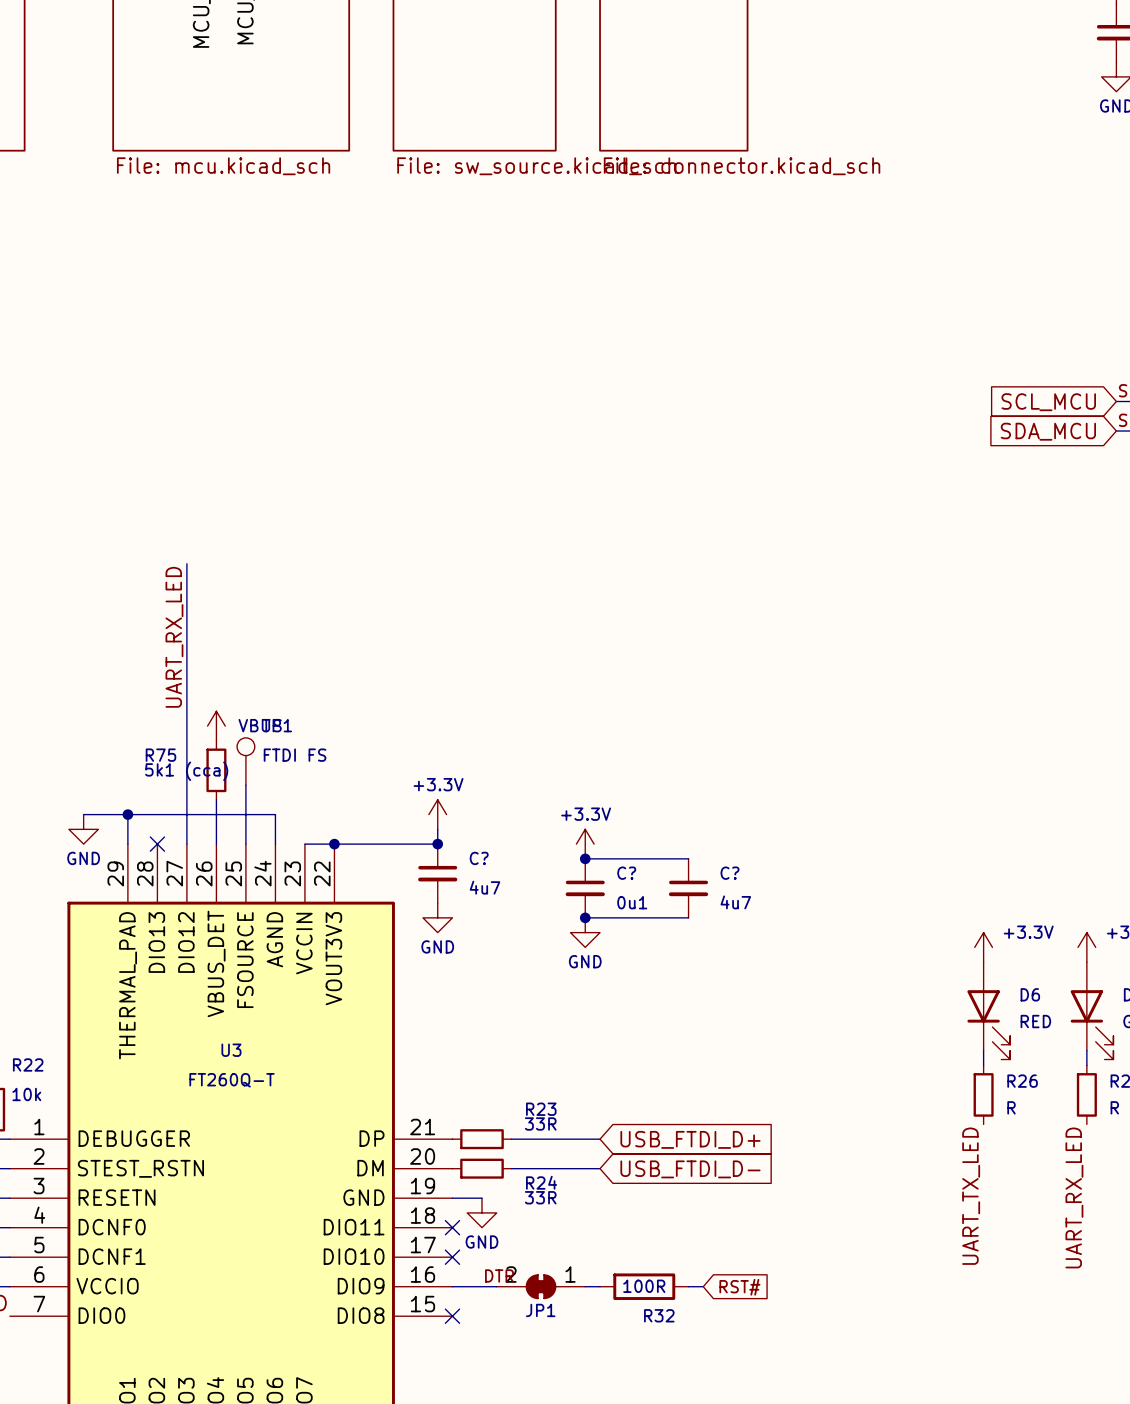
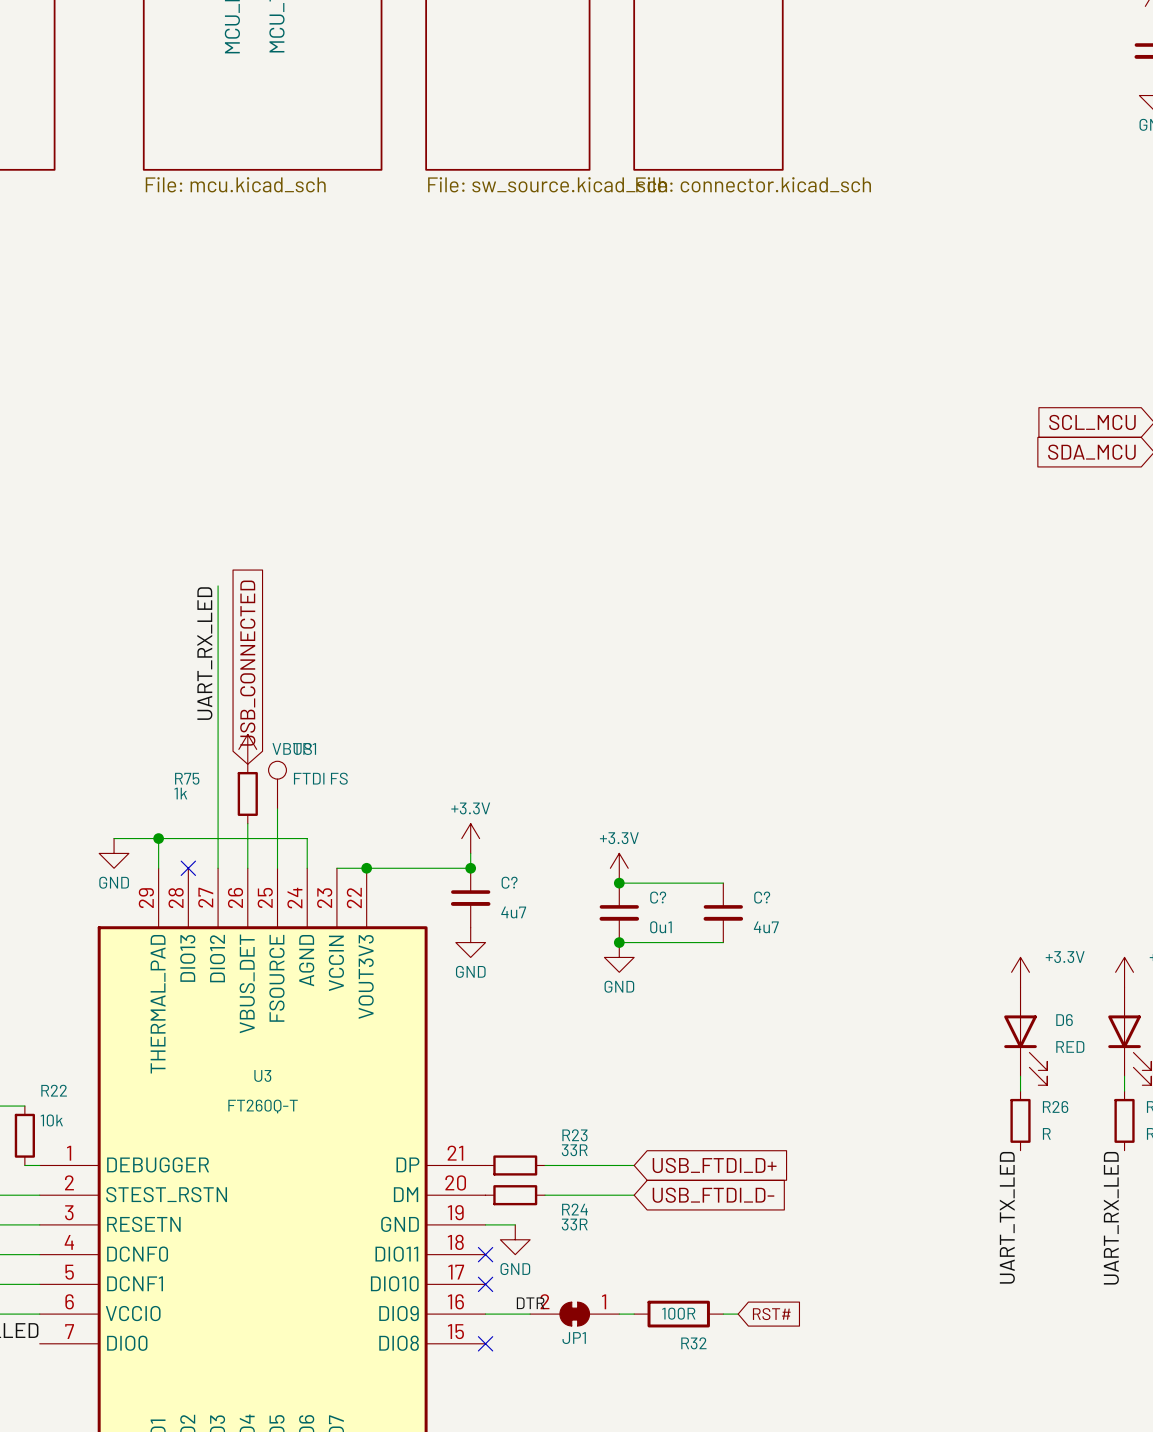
global label: none -> USB_CONNECTED (247, 663)
R75 value: 5k1 (cca) (186, 771) -> 1k (180, 793)

